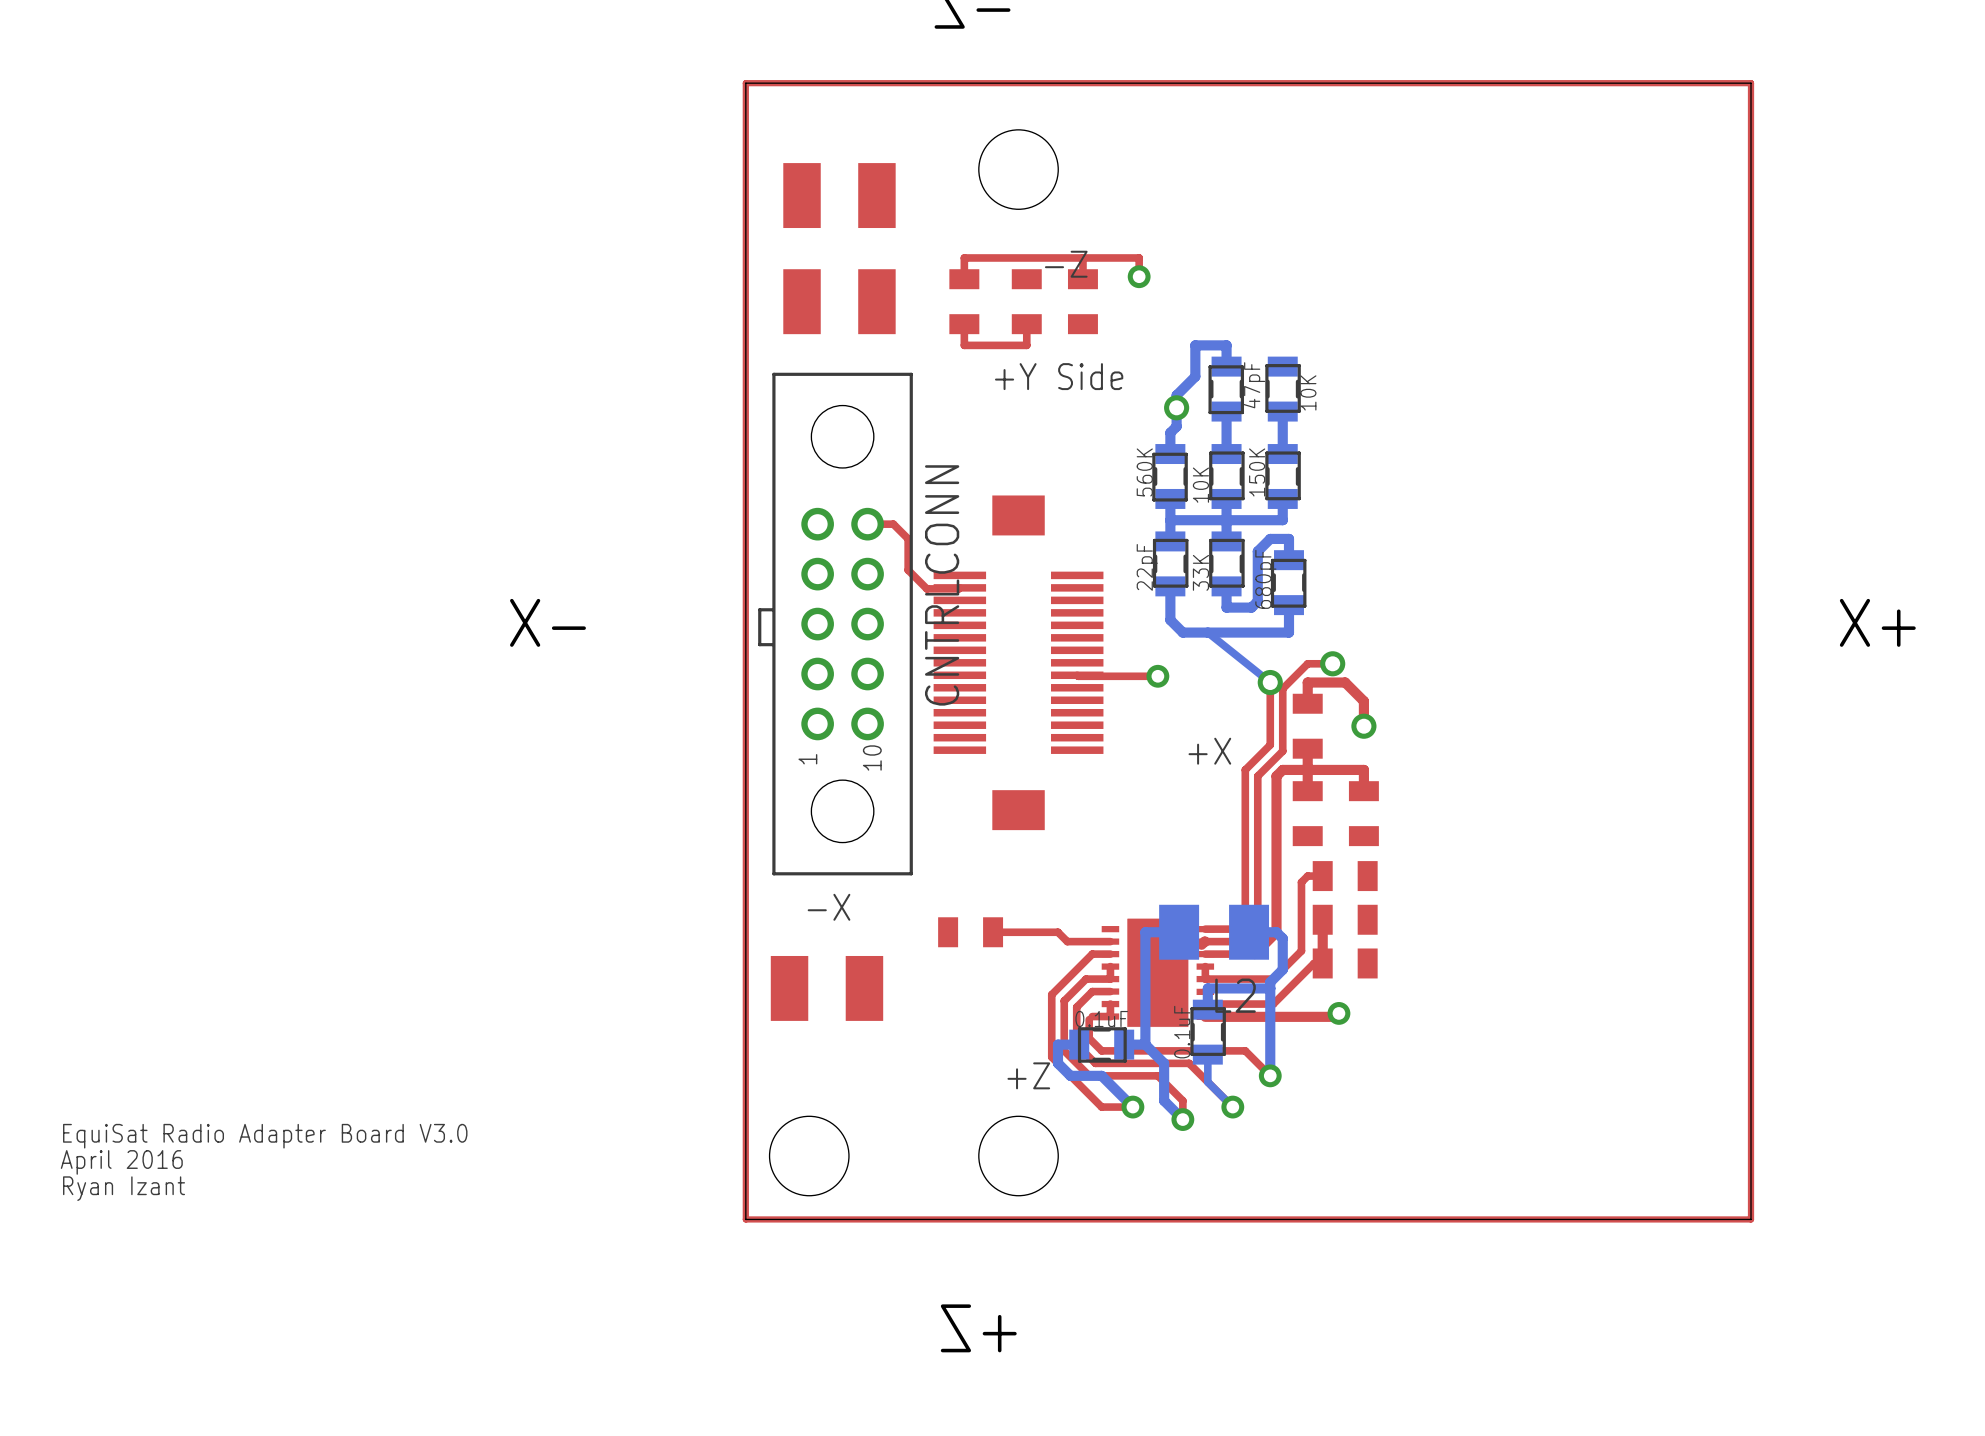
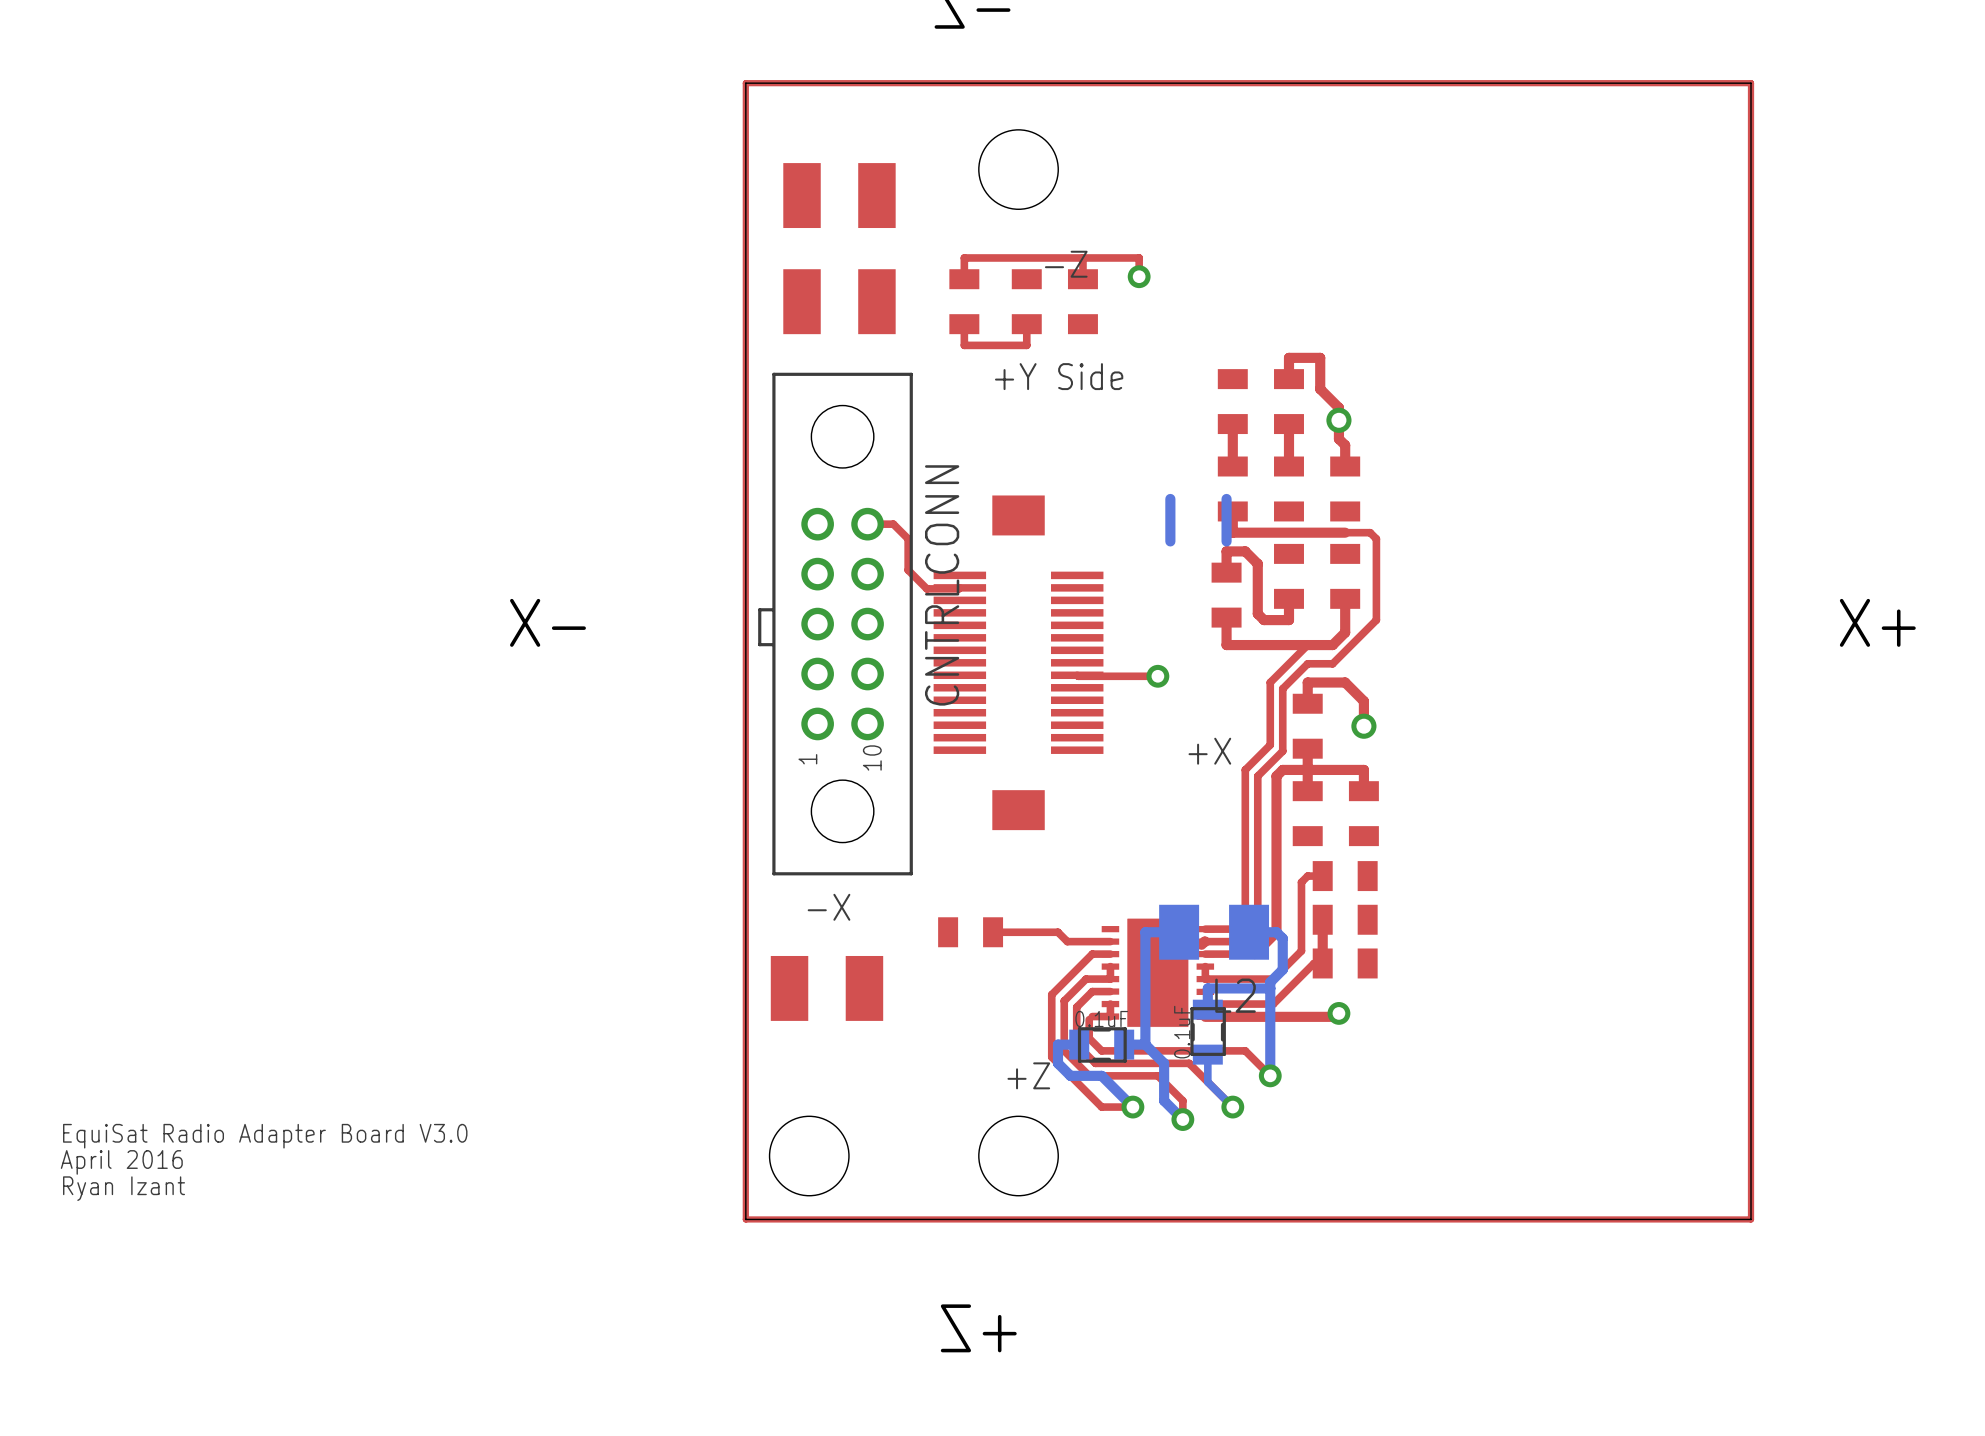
bottom track: (1226, 366) (1226, 345) (1195, 345) (1195, 376) (1176, 395) (1176, 426) (1170, 432) (1170, 454) -> none
top track: none -> (1288, 379) (1288, 357) (1320, 357) (1320, 389) (1338, 407) (1338, 439) (1345, 445) (1345, 466)
part side: bottom (1226, 389) -> top (1232, 401)
part side: bottom (1283, 389) -> top (1288, 401)
via: (1176, 407) -> none
bottom track: (1226, 411) (1226, 454) -> none
bottom track: (1282, 411) (1282, 454) -> none
via: none -> (1338, 420)
top track: none -> (1232, 424) (1232, 466)
top track: none -> (1288, 424) (1288, 466)
part side: bottom (1170, 476) -> top (1345, 488)
part side: bottom (1226, 476) -> top (1232, 488)
part side: bottom (1283, 476) -> top (1288, 488)
bottom track: (1282, 498) (1282, 520) (1170, 520) -> none
top track: none -> (1232, 511) (1232, 532) (1370, 532) (1376, 538) (1376, 620) (1332, 663)
bottom track: (1288, 560) (1288, 538) (1270, 538) (1257, 551) (1257, 601) (1251, 607) (1226, 607) (1226, 586) -> none
part side: bottom (1170, 563) -> top (1345, 576)
part: 33K (1226, 563) -> none
top track: none -> (1226, 572) (1226, 551) (1245, 551) (1257, 563) (1257, 613) (1264, 620) (1288, 620) (1288, 598)
part side: bottom (1288, 582) -> top (1288, 576)
bottom track: (1170, 586) (1170, 620) (1182, 632) (1288, 632) (1288, 605) -> none
part: none -> (1226, 595)
top track: none -> (1345, 598) (1345, 632) (1332, 645) (1226, 645) (1226, 617)
bottom track: (1207, 632) (1270, 682) -> none
top track: none -> (1307, 645) (1270, 682)
via: (1332, 663) -> none
via: (1270, 682) -> none

